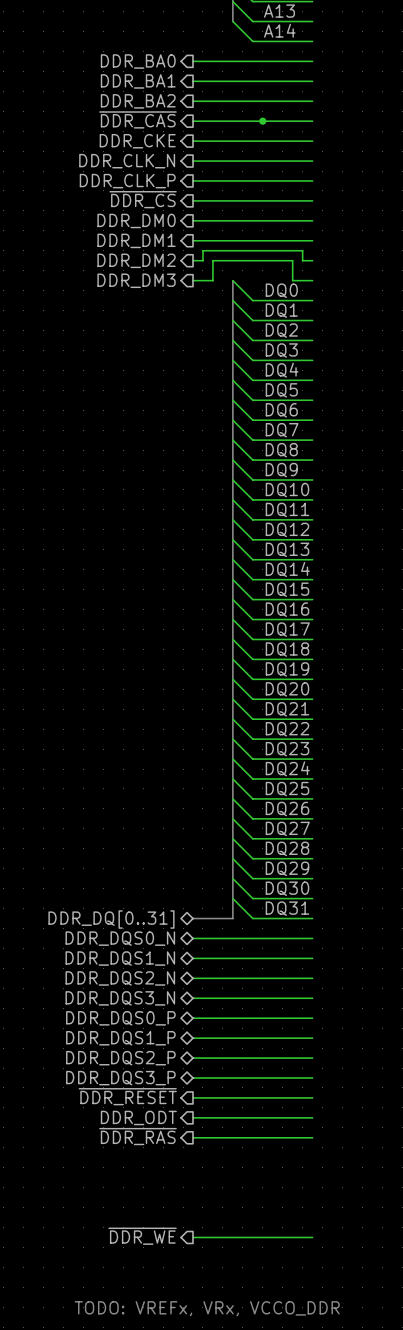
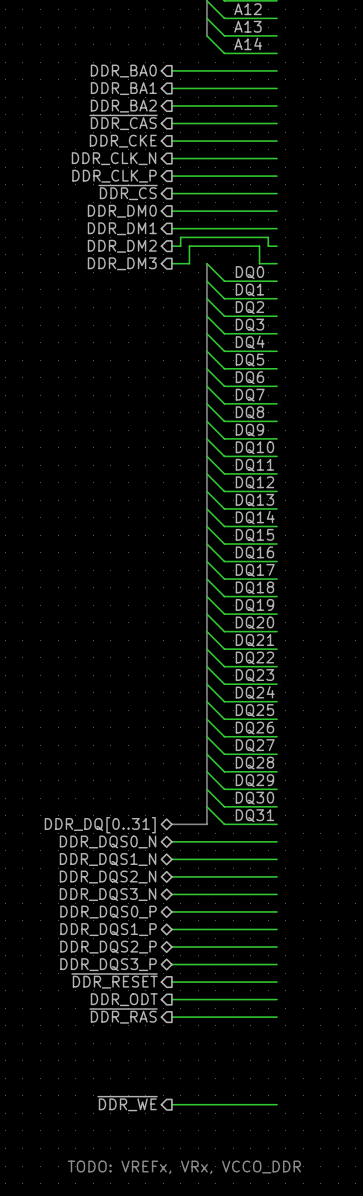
junction: (262, 121) -> none

